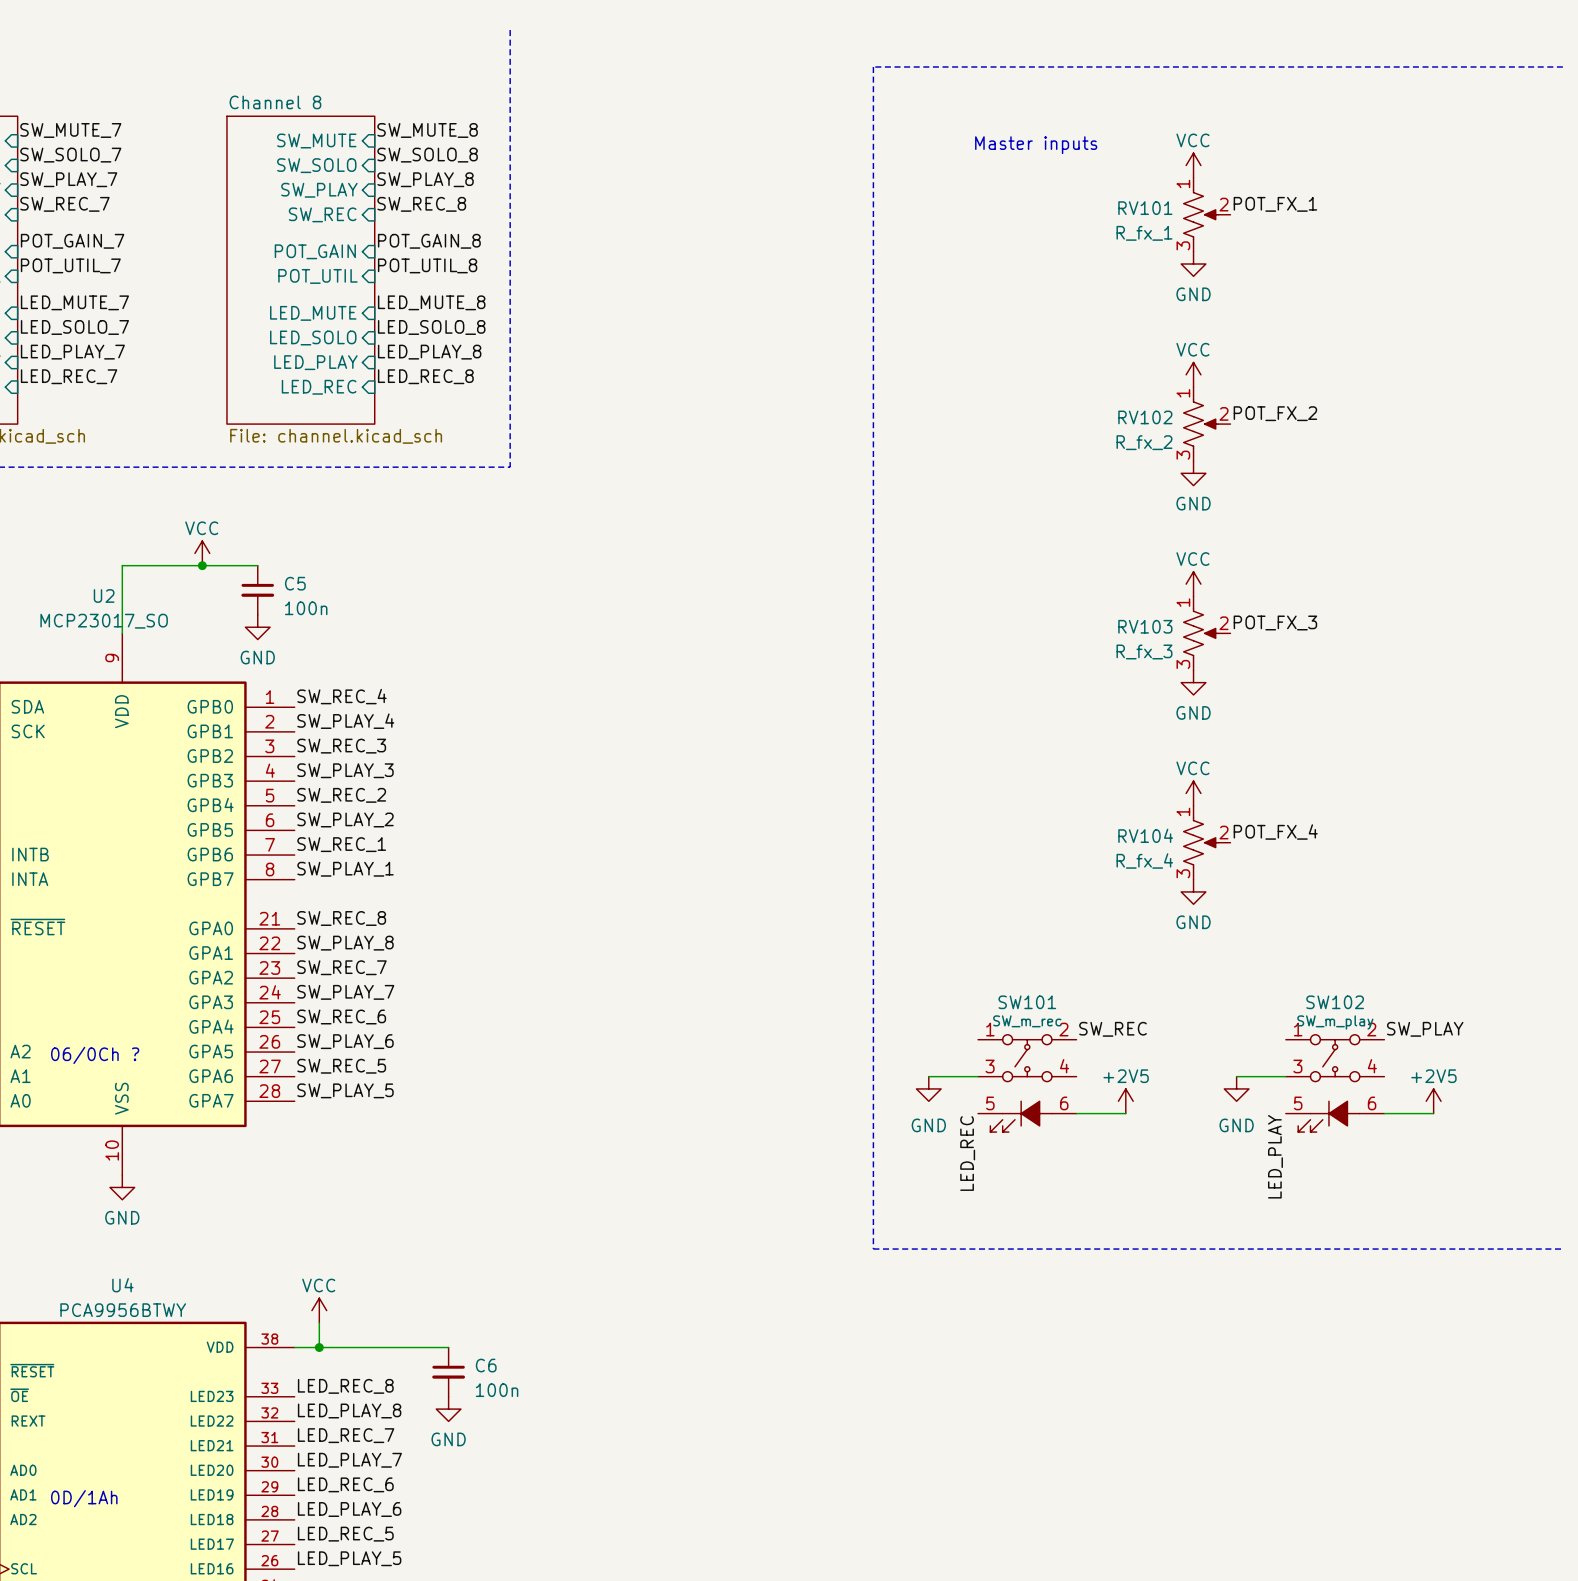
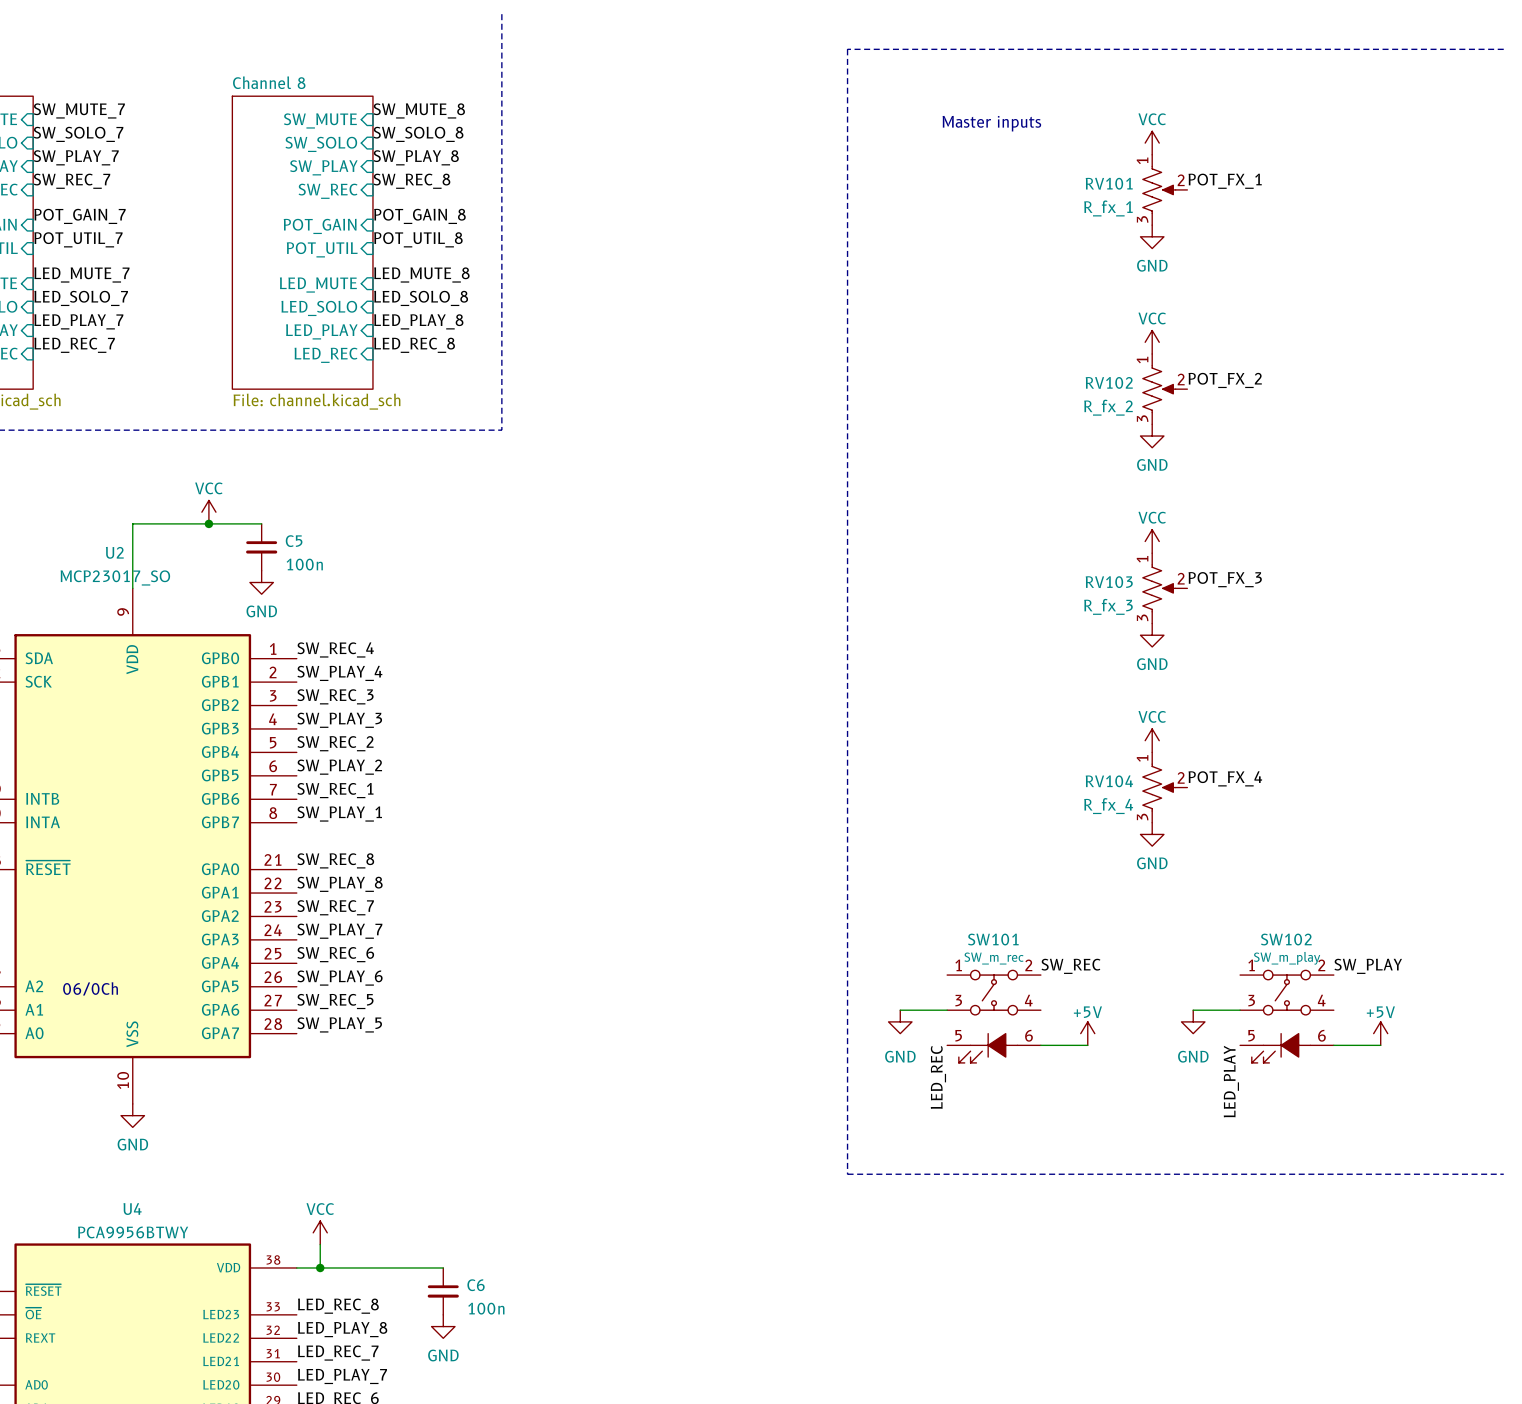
text: 06/0Ch ? (95, 1055) -> 06/0Ch (90, 988)
power symbol: +2V5 (1125, 1101) -> +5V (1087, 1033)
power symbol: +2V5 (1433, 1101) -> +5V (1380, 1033)

